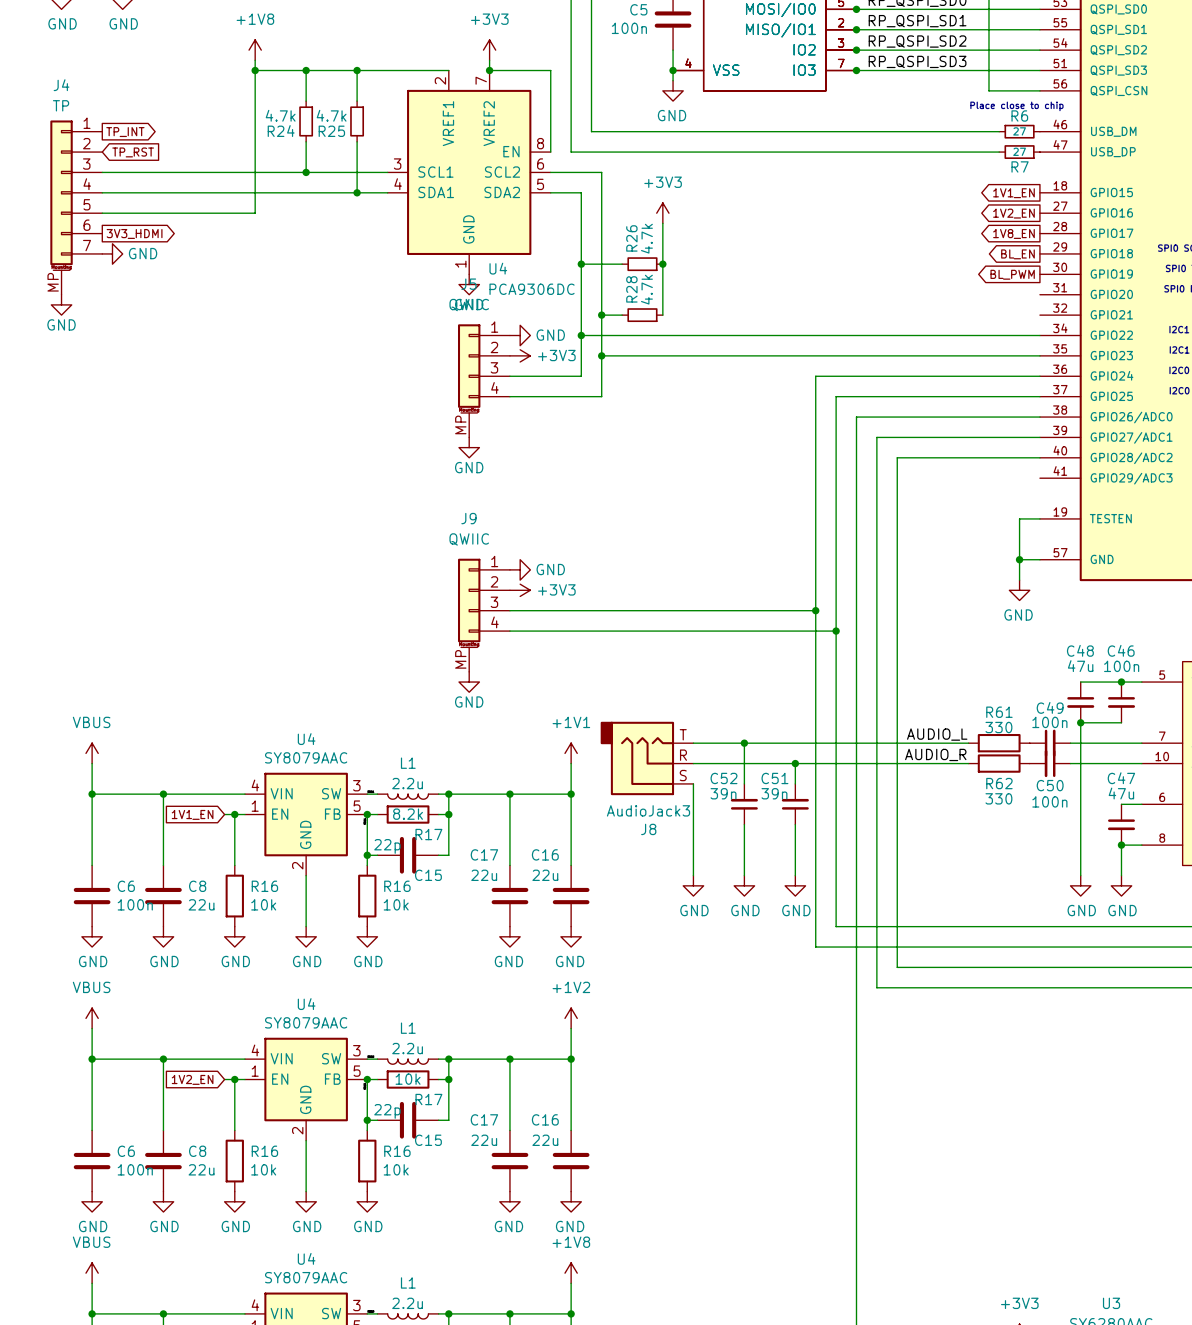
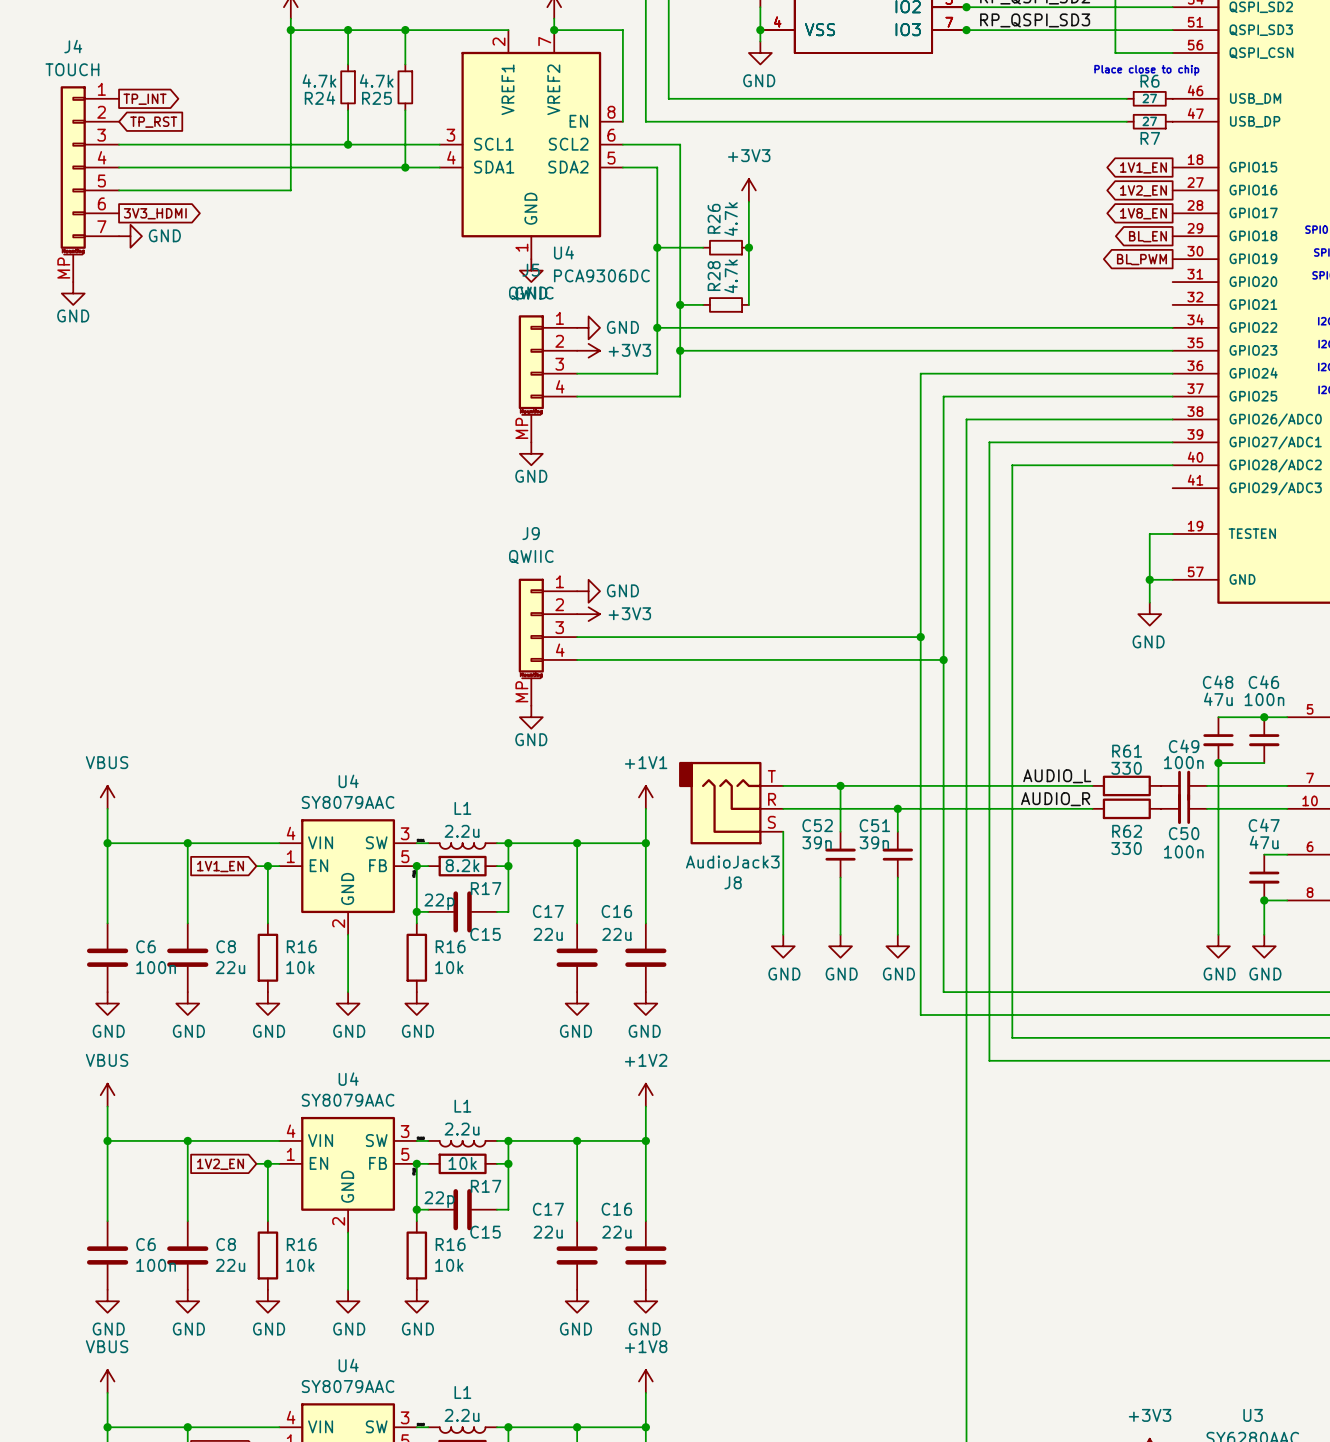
J4 value: TP (61, 105) -> TOUCH (72, 69)

